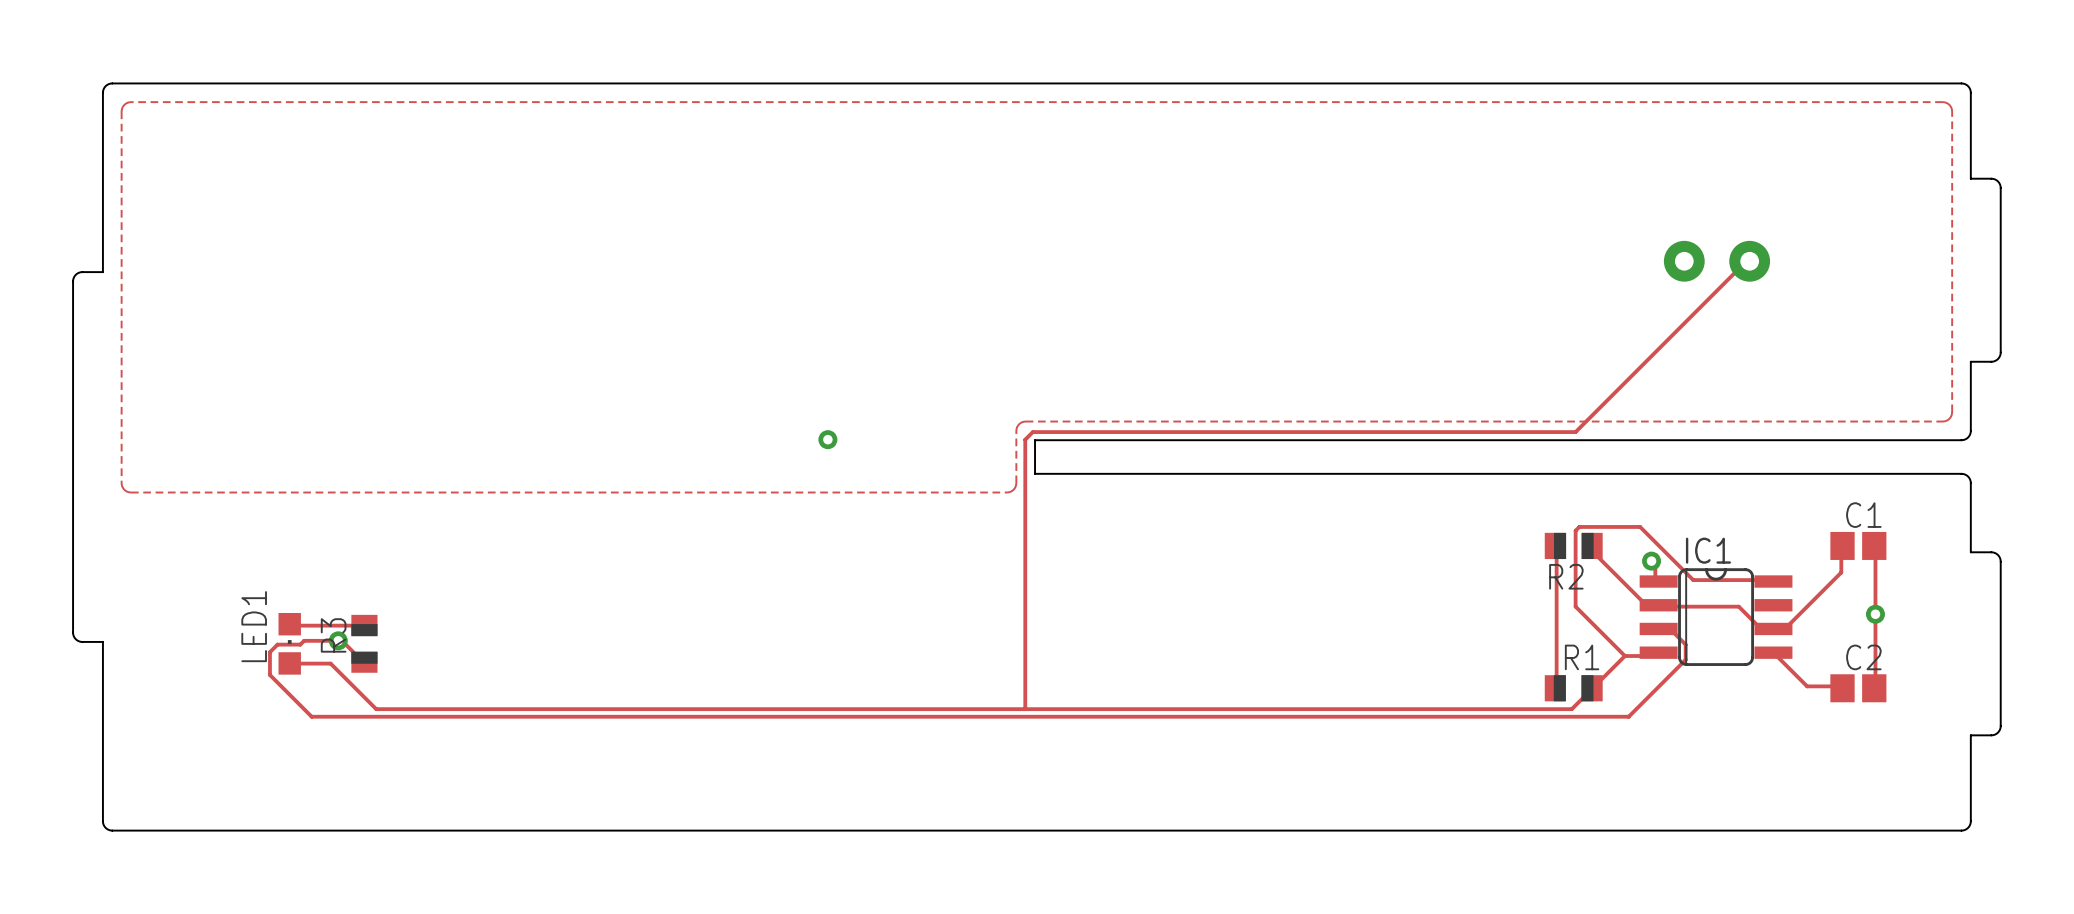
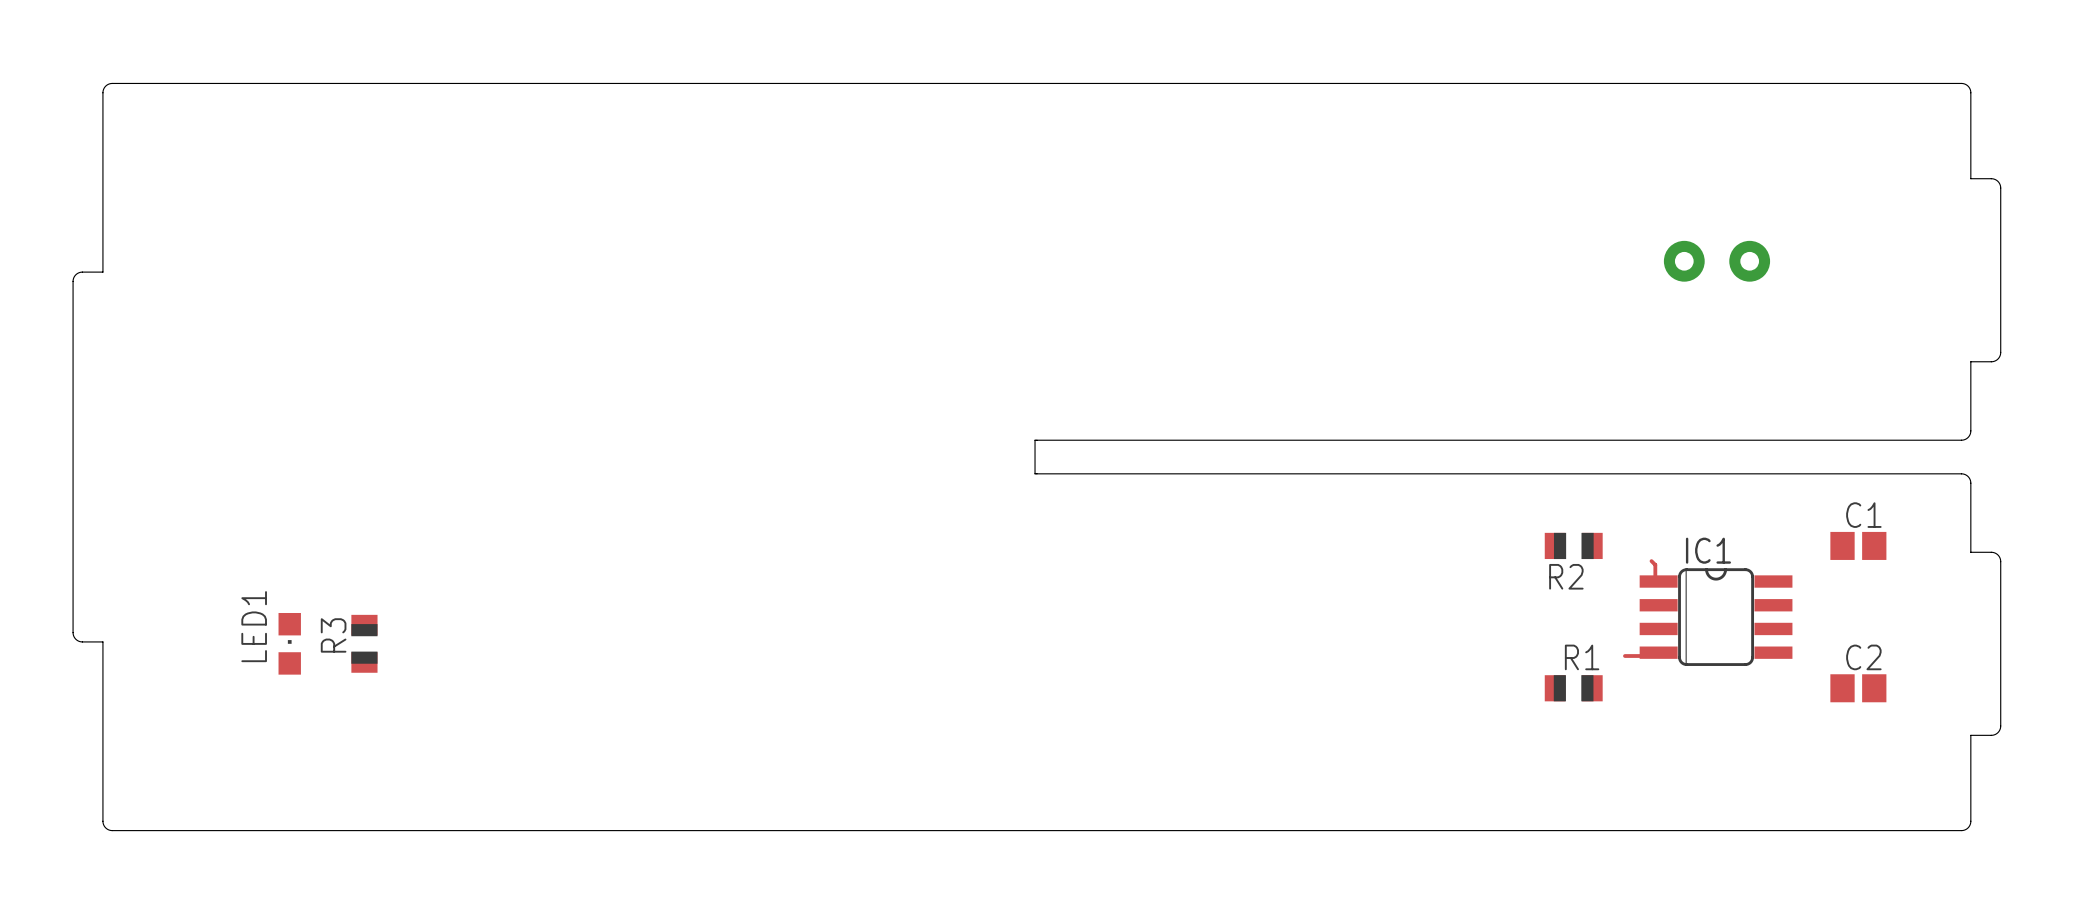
zone outline: (129, 102) (1944, 102) (1950, 105) (1952, 111) (1952, 413) (1949, 418) (1942, 421) (1024, 421) (1019, 424) (1016, 429) (1016, 485) (1012, 490) (1007, 492) (129, 492) (123, 488) (121, 483) (121, 111) (124, 104) (129, 102) -> none
track: (1749, 261) (1746, 261) (1575, 432) (1032, 432) (1025, 439) (1025, 709) -> none
via: (827, 439) -> none
track: (1555, 545) (1556, 545) (1556, 686) (1555, 688) -> none
track: (1592, 545) (1594, 545) (1594, 553) (1643, 602) (1655, 602) (1659, 606) (1738, 606) (1757, 625) (1772, 625) (1773, 628) (1776, 625) (1788, 625) (1841, 572) (1842, 545) -> none
track: (1874, 545) (1874, 688) -> none
via: (1651, 561) -> none
track: (1773, 581) (1693, 580) (1640, 526) (1579, 526) (1575, 530) (1575, 606) (1624, 656) (1571, 709) (376, 709) (330, 663) (289, 663) -> none
via: (1875, 614) -> none
track: (289, 624) (364, 625) -> none
track: (1658, 628) (1670, 629) (1685, 644) (1685, 659) (1628, 716) (311, 716) (269, 674) (269, 652) (277, 644) (300, 644) (304, 640) (342, 640) (364, 662) -> none
via: (338, 640) -> none
track: (1773, 652) (1807, 686) (1841, 686) (1842, 688) -> none

